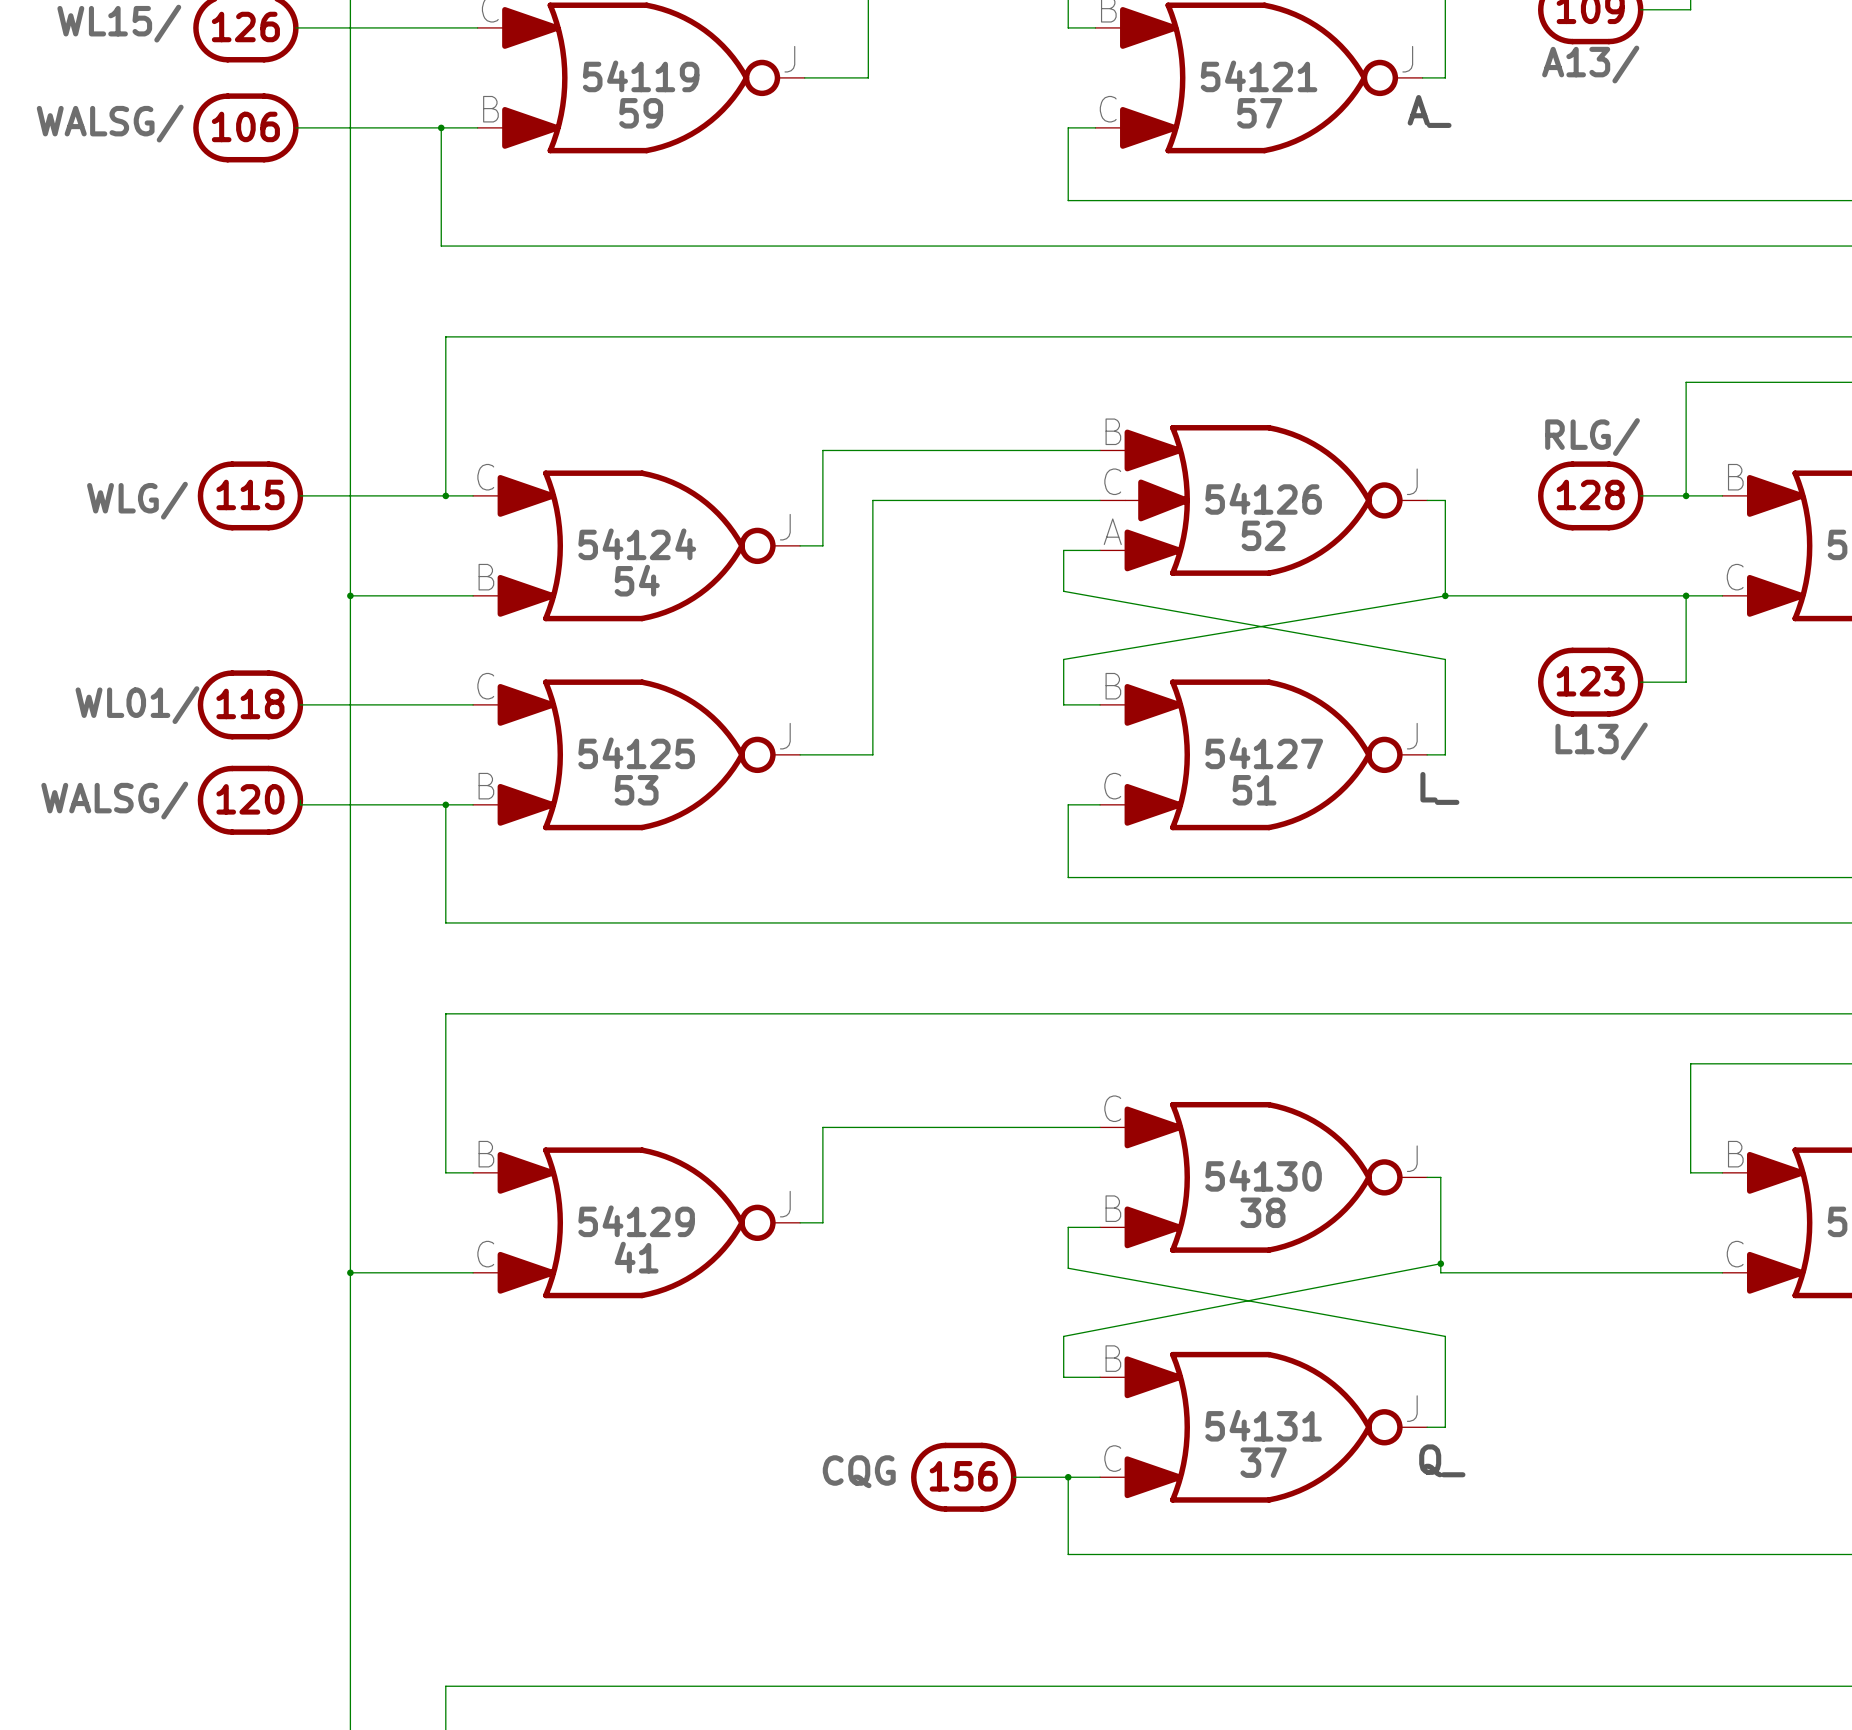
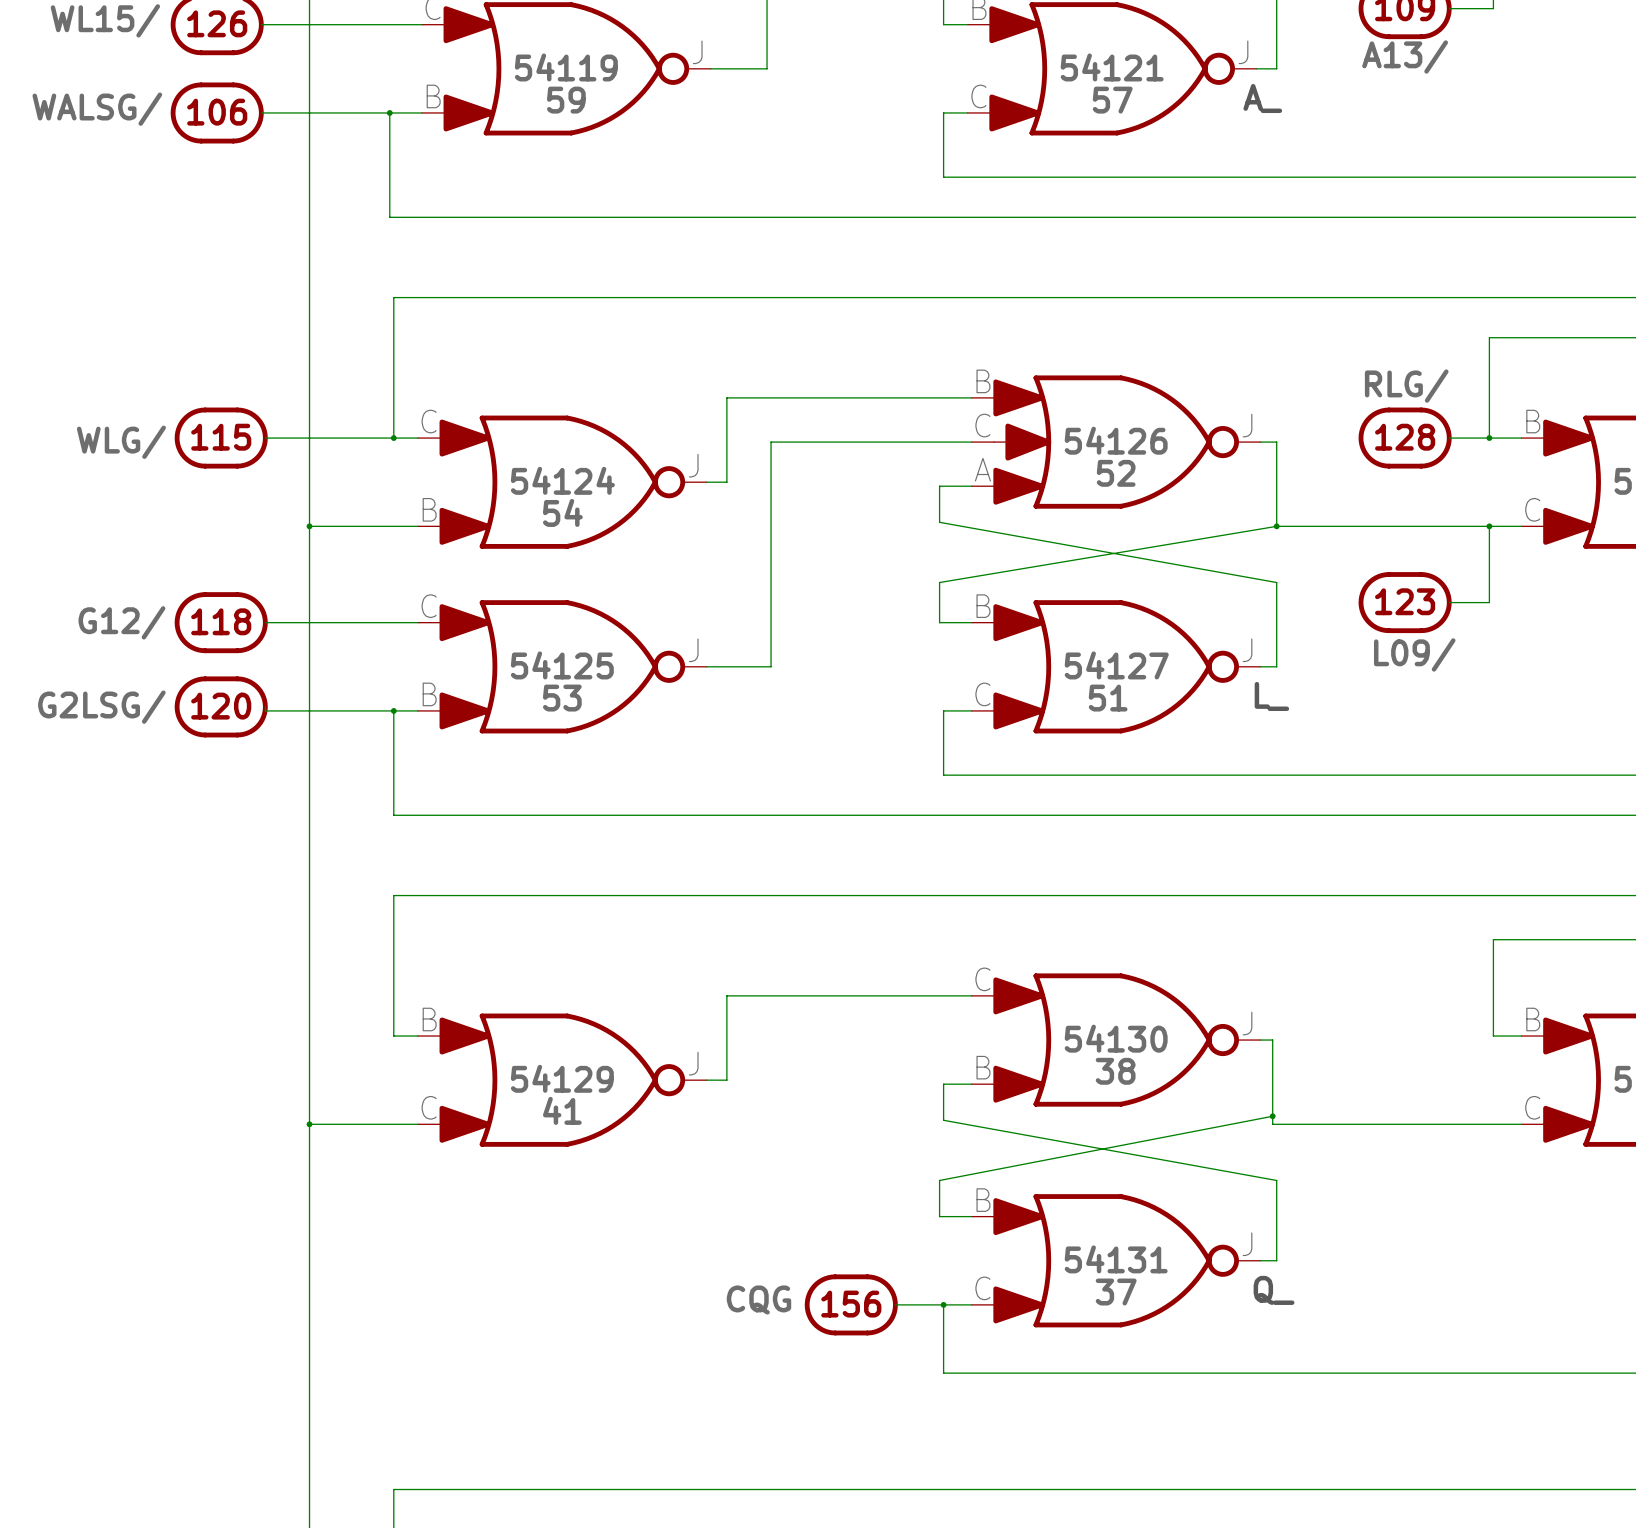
part text: WL01/ (137, 705) -> G12/ (121, 622)
part text: L13/ (1601, 741) -> L09/ (1414, 654)
part text: WALSG/ (114, 800) -> G2LSG/ (101, 707)

